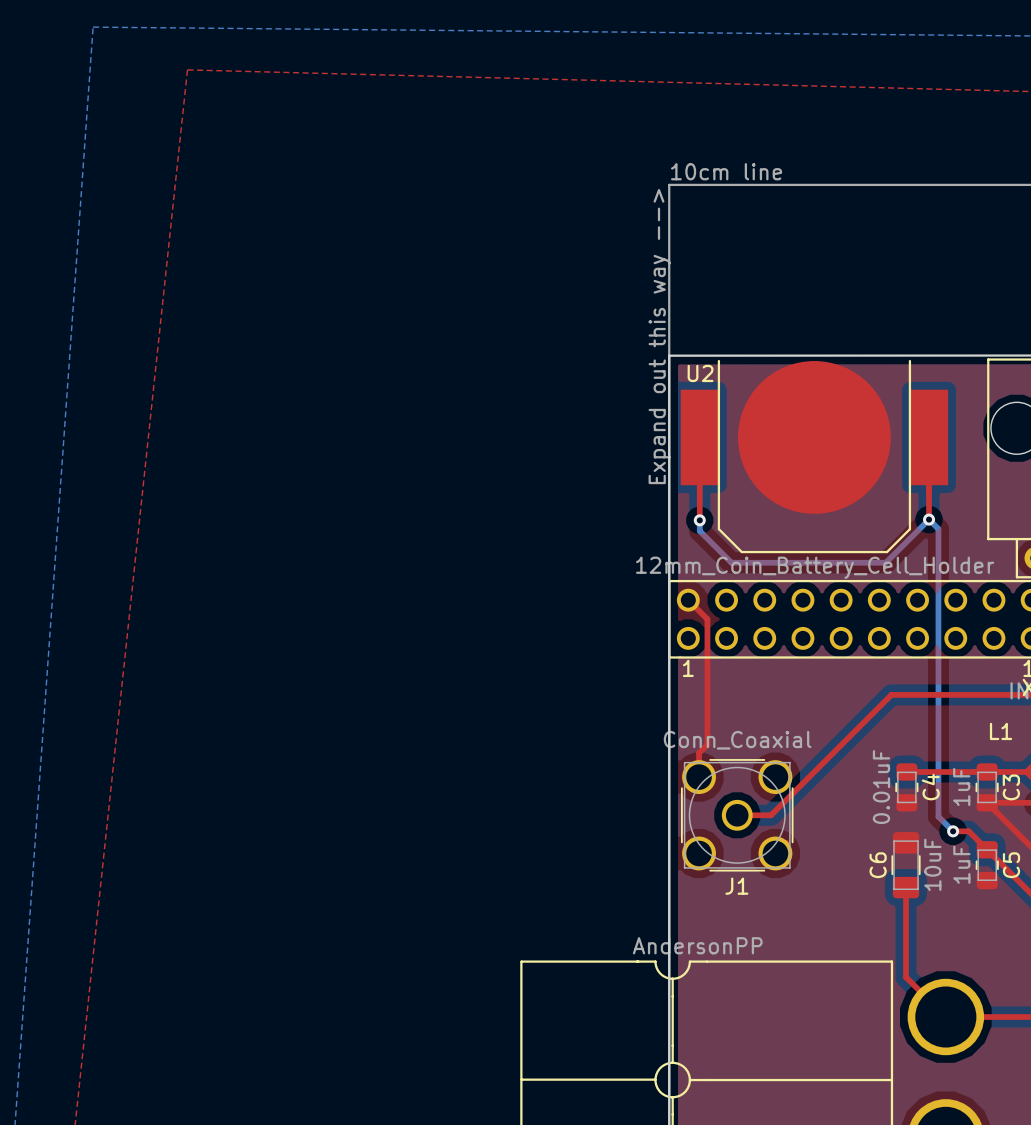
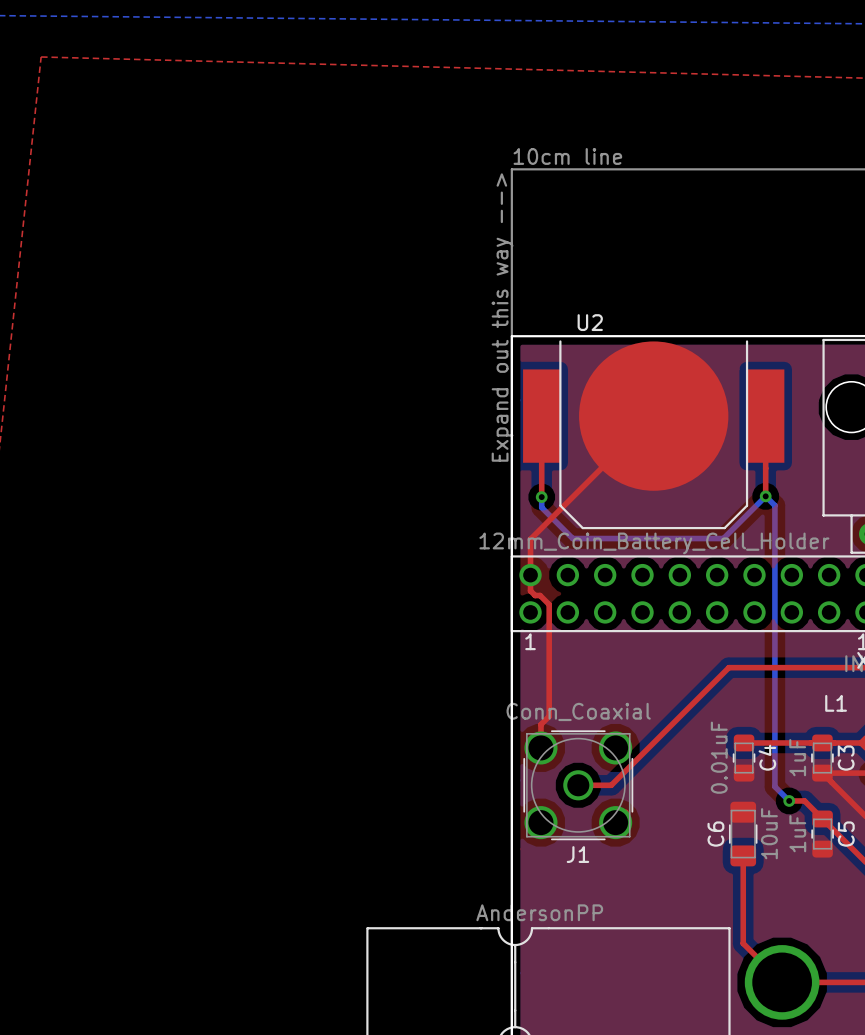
U2 name position: U2 (700, 373) -> U2 (590, 322)
top track: (688, 600) (707, 619) (707, 630) -> (653, 416) (530, 539) (530, 590) (535, 595) (540, 595) (549, 604)

